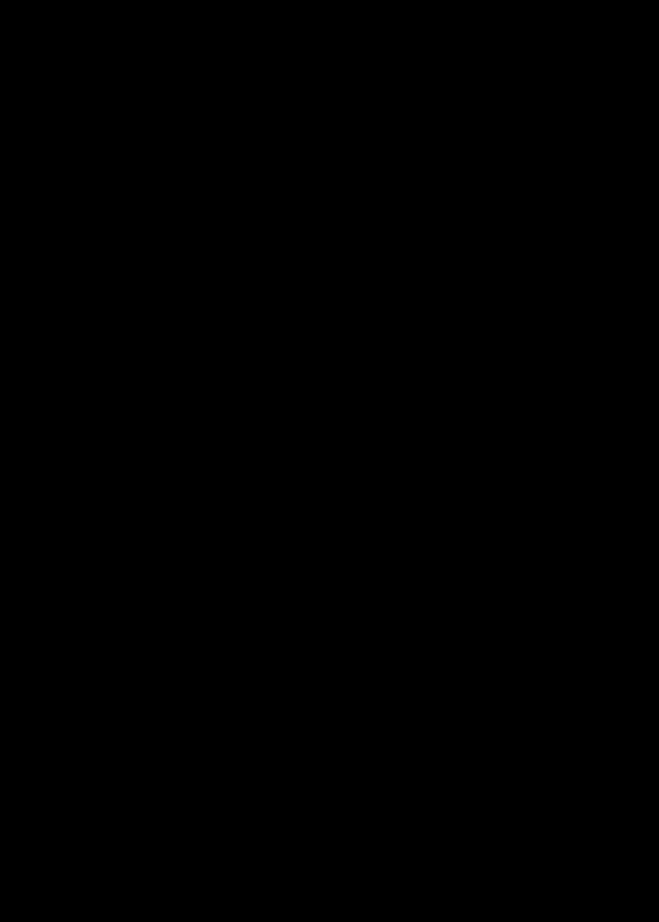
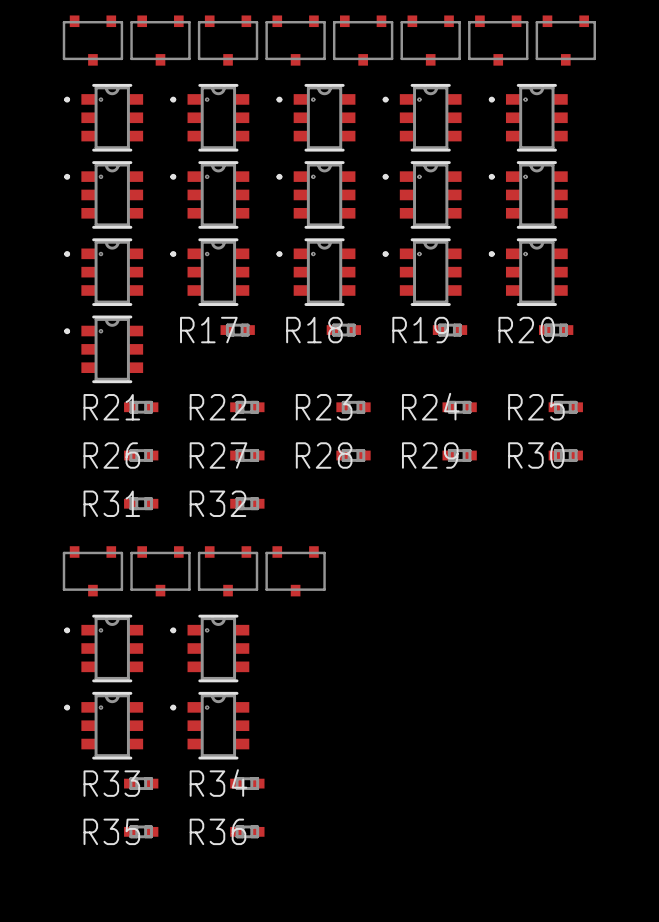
part: none -> (92, 40)
part: none -> (160, 40)
part: none -> (228, 40)
part: none -> (295, 40)
part: none -> (363, 40)
part: none -> (430, 40)
part: none -> (498, 40)
part: none -> (565, 40)
part: none -> (103, 117)
part: none -> (209, 117)
part: none -> (315, 117)
part: none -> (422, 117)
part: none -> (528, 117)
part: none -> (103, 194)
part: none -> (209, 194)
part: none -> (315, 194)
part: none -> (422, 194)
part: none -> (528, 194)
part: none -> (103, 272)
part: none -> (209, 272)
part: none -> (315, 272)
part: none -> (422, 272)
part: none -> (528, 272)
R17: none -> (237, 330)
R18: none -> (343, 330)
R19: none -> (450, 330)
R20: none -> (556, 330)
part: none -> (103, 349)
R21: none -> (141, 407)
R22: none -> (247, 407)
R23: none -> (353, 407)
R24: none -> (459, 407)
R25: none -> (565, 407)
R26: none -> (141, 455)
R27: none -> (247, 455)
R28: none -> (353, 455)
R29: none -> (459, 455)
R30: none -> (565, 455)
R31: none -> (141, 503)
R32: none -> (247, 503)
part: none -> (92, 571)
part: none -> (160, 571)
part: none -> (228, 571)
part: none -> (295, 571)
part: none -> (103, 648)
part: none -> (209, 648)
part: none -> (103, 725)
part: none -> (209, 725)
R33: none -> (141, 783)
R34: none -> (247, 783)
R35: none -> (141, 831)
R36: none -> (247, 831)

